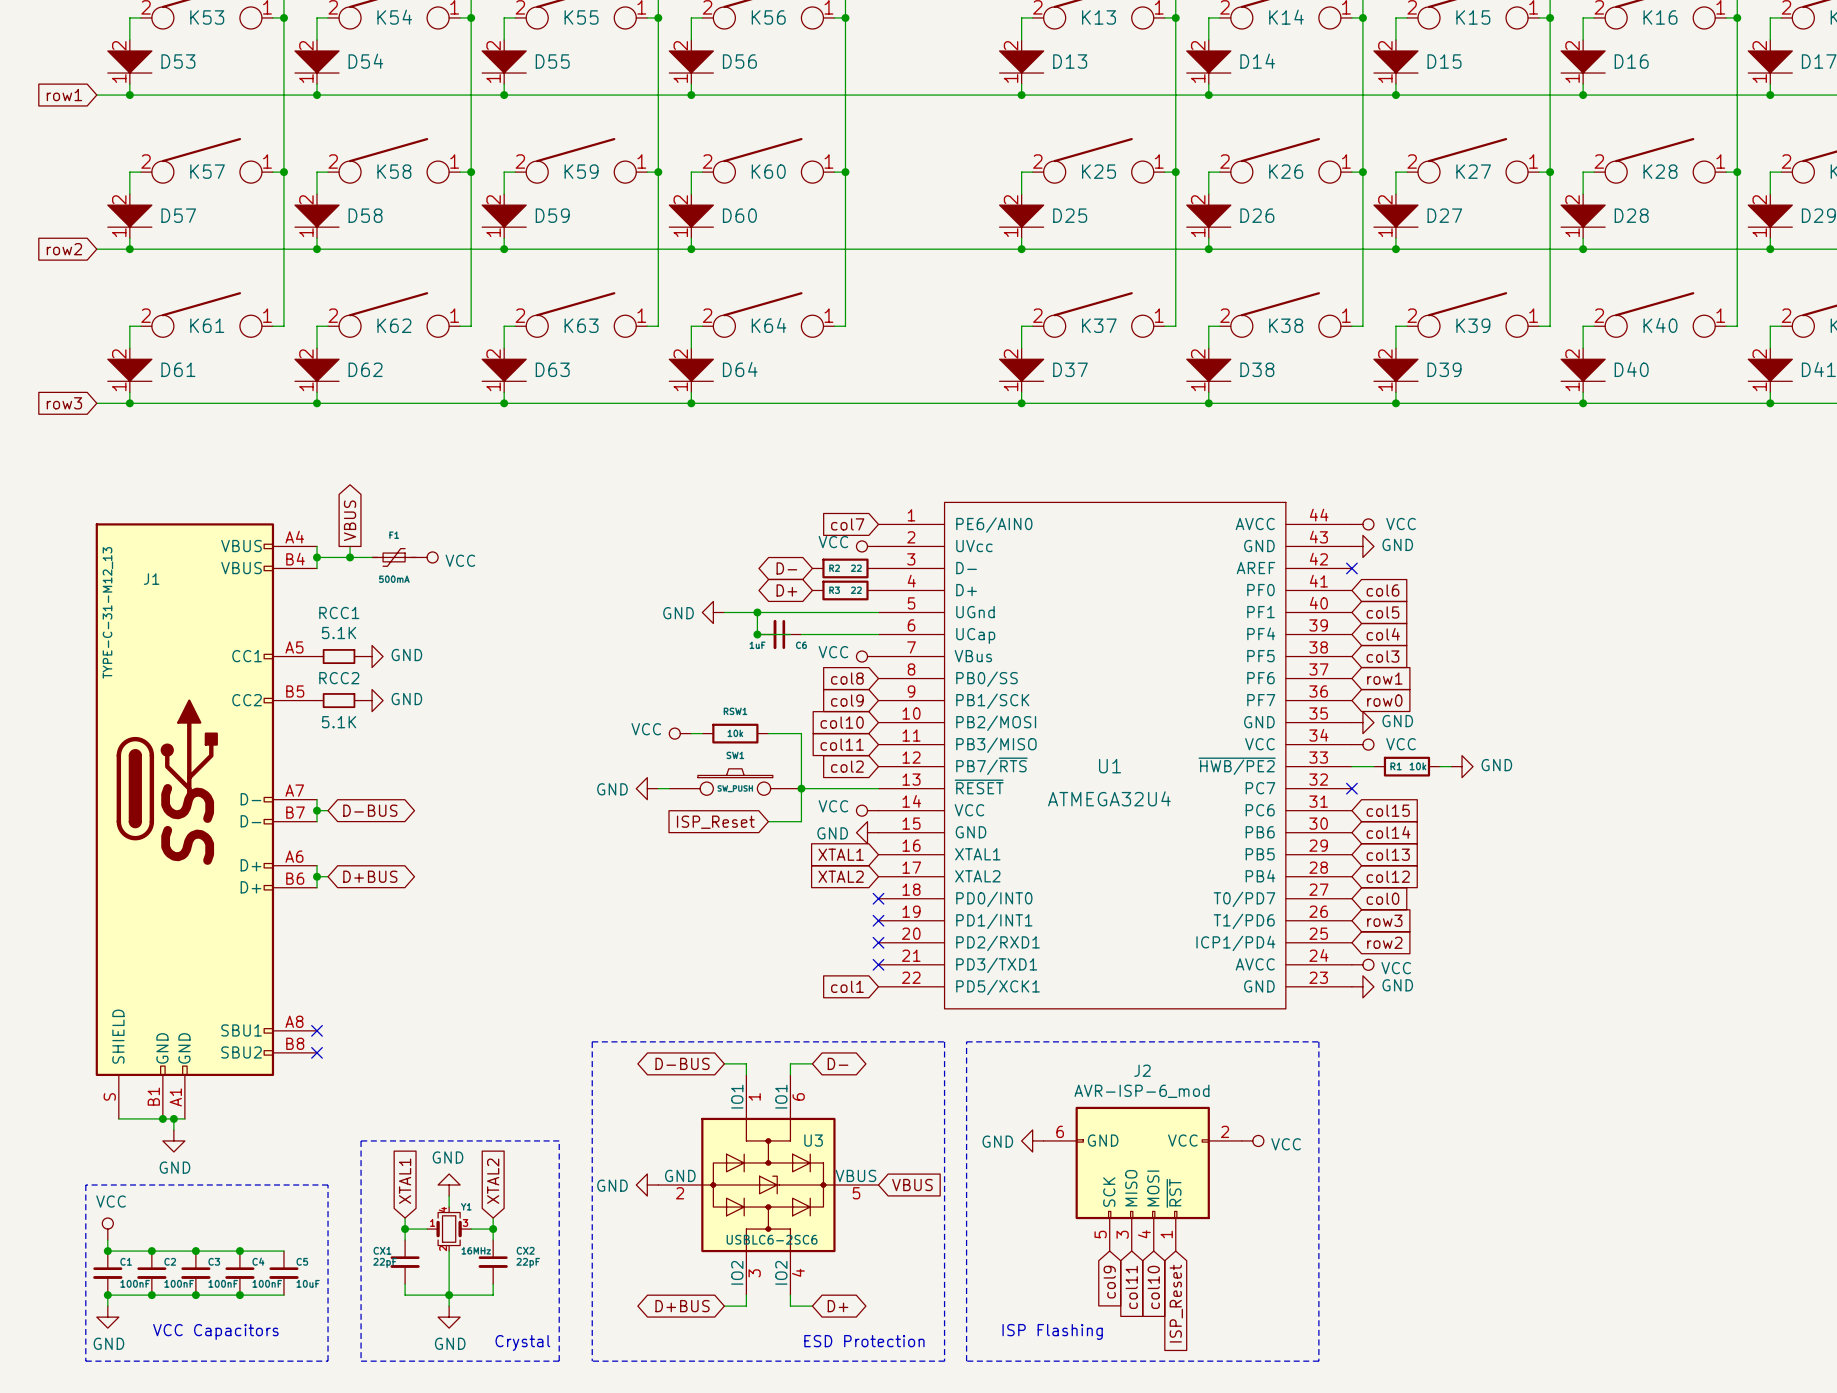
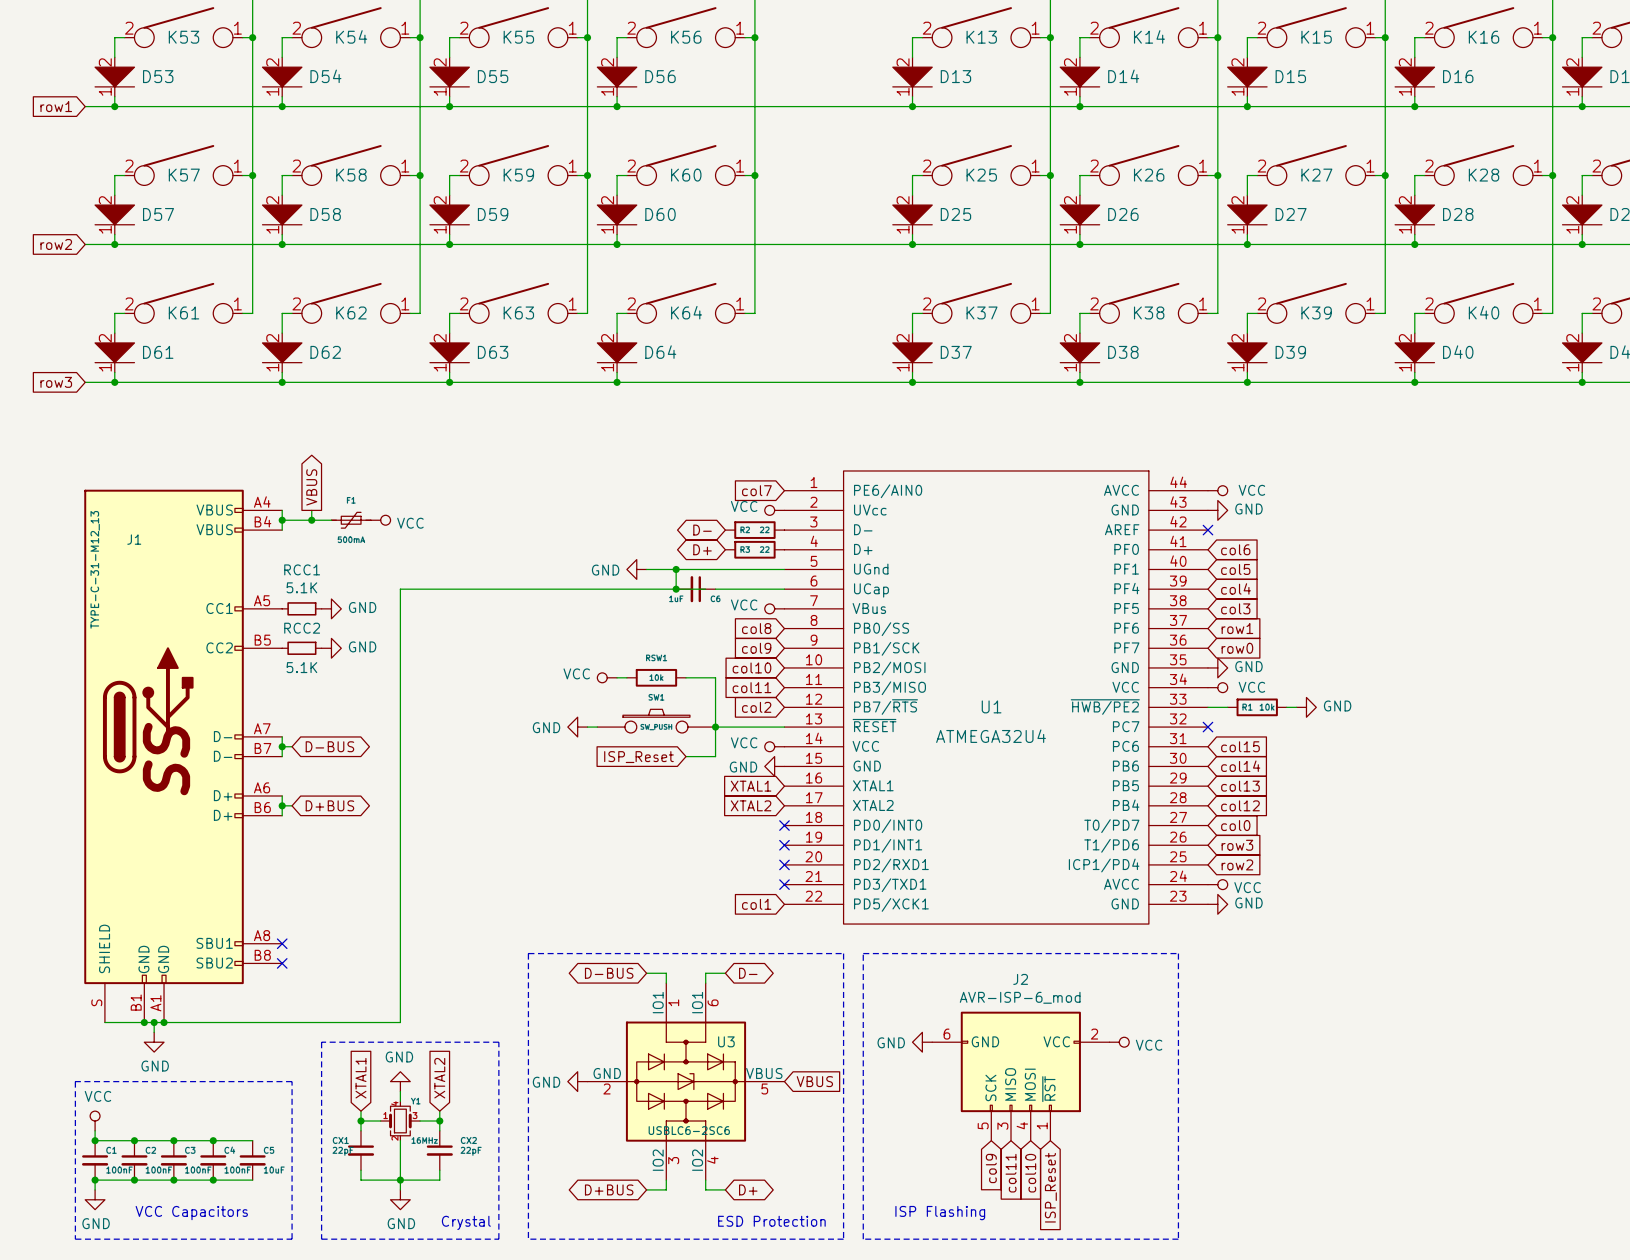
wire: none -> (676, 589) (400, 589) (400, 1022) (164, 1022)
junction: none -> (164, 1022)

